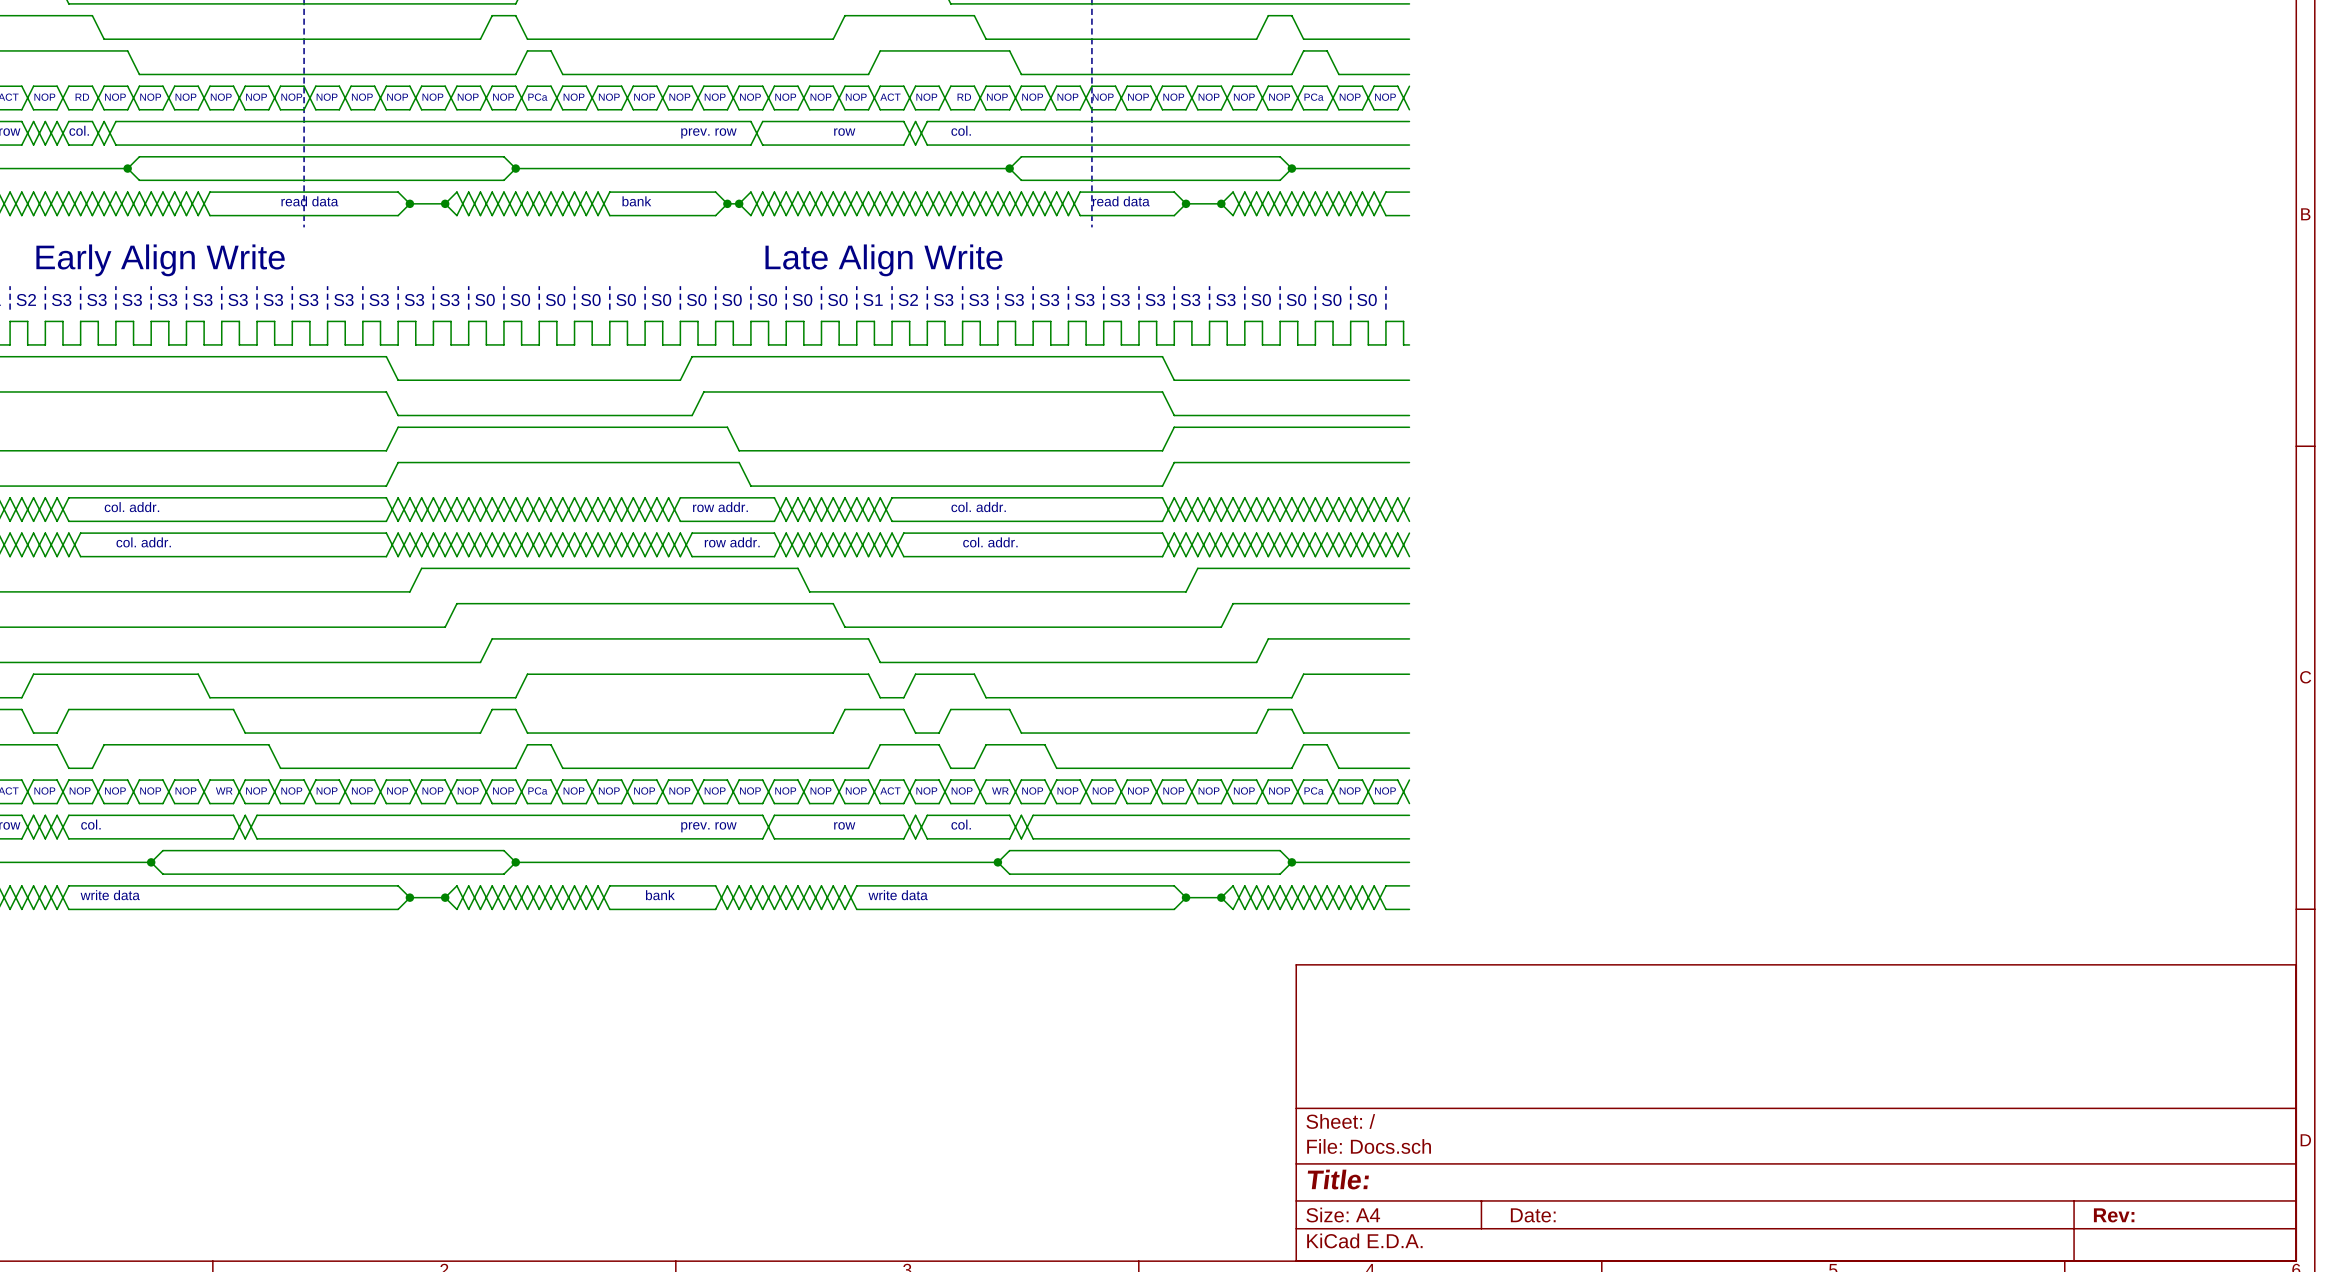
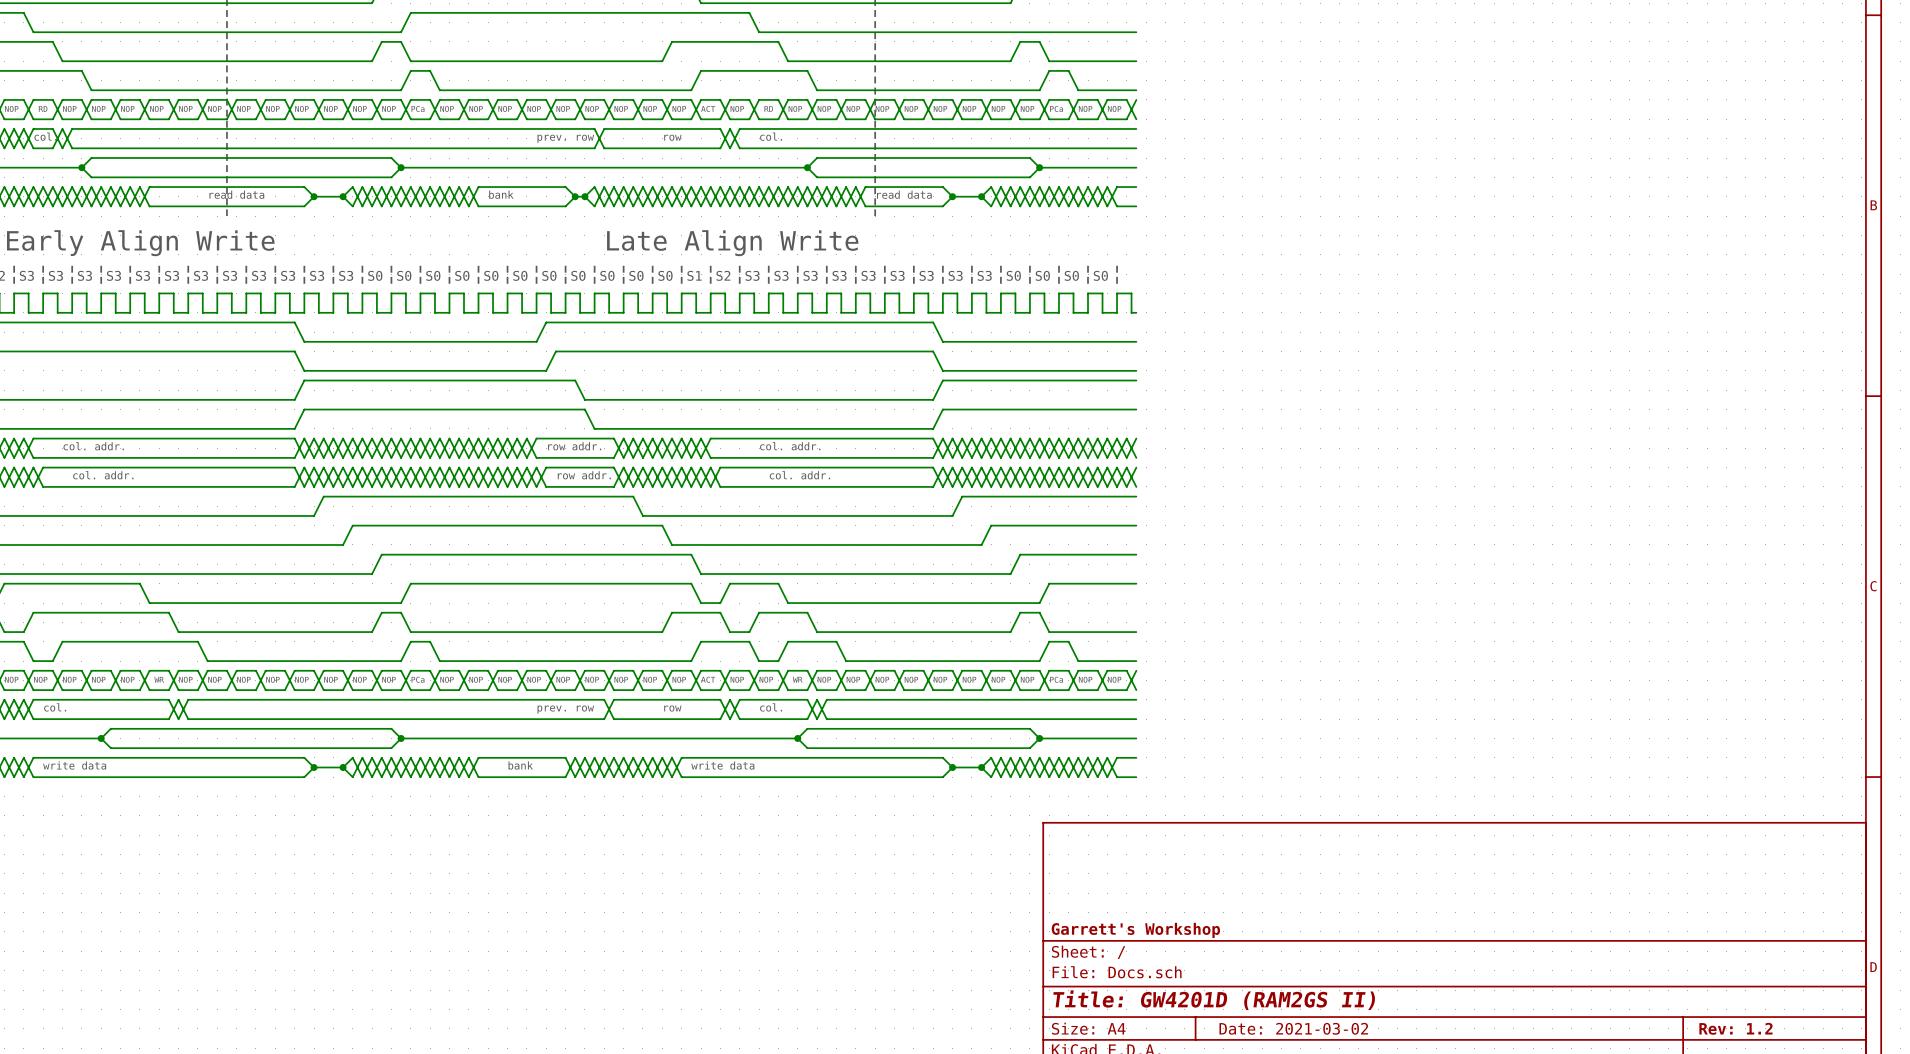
title block: none -> Garrett's Workshop (1135, 930)
title block: Title: (1338, 1179) -> Title: GW4201D (RAM2GS II) (1214, 1000)
title block: Date: (1533, 1215) -> Date: 2021-03-02 (1293, 1028)
title block: Rev: (2114, 1215) -> Rev: 1.2 (1735, 1028)

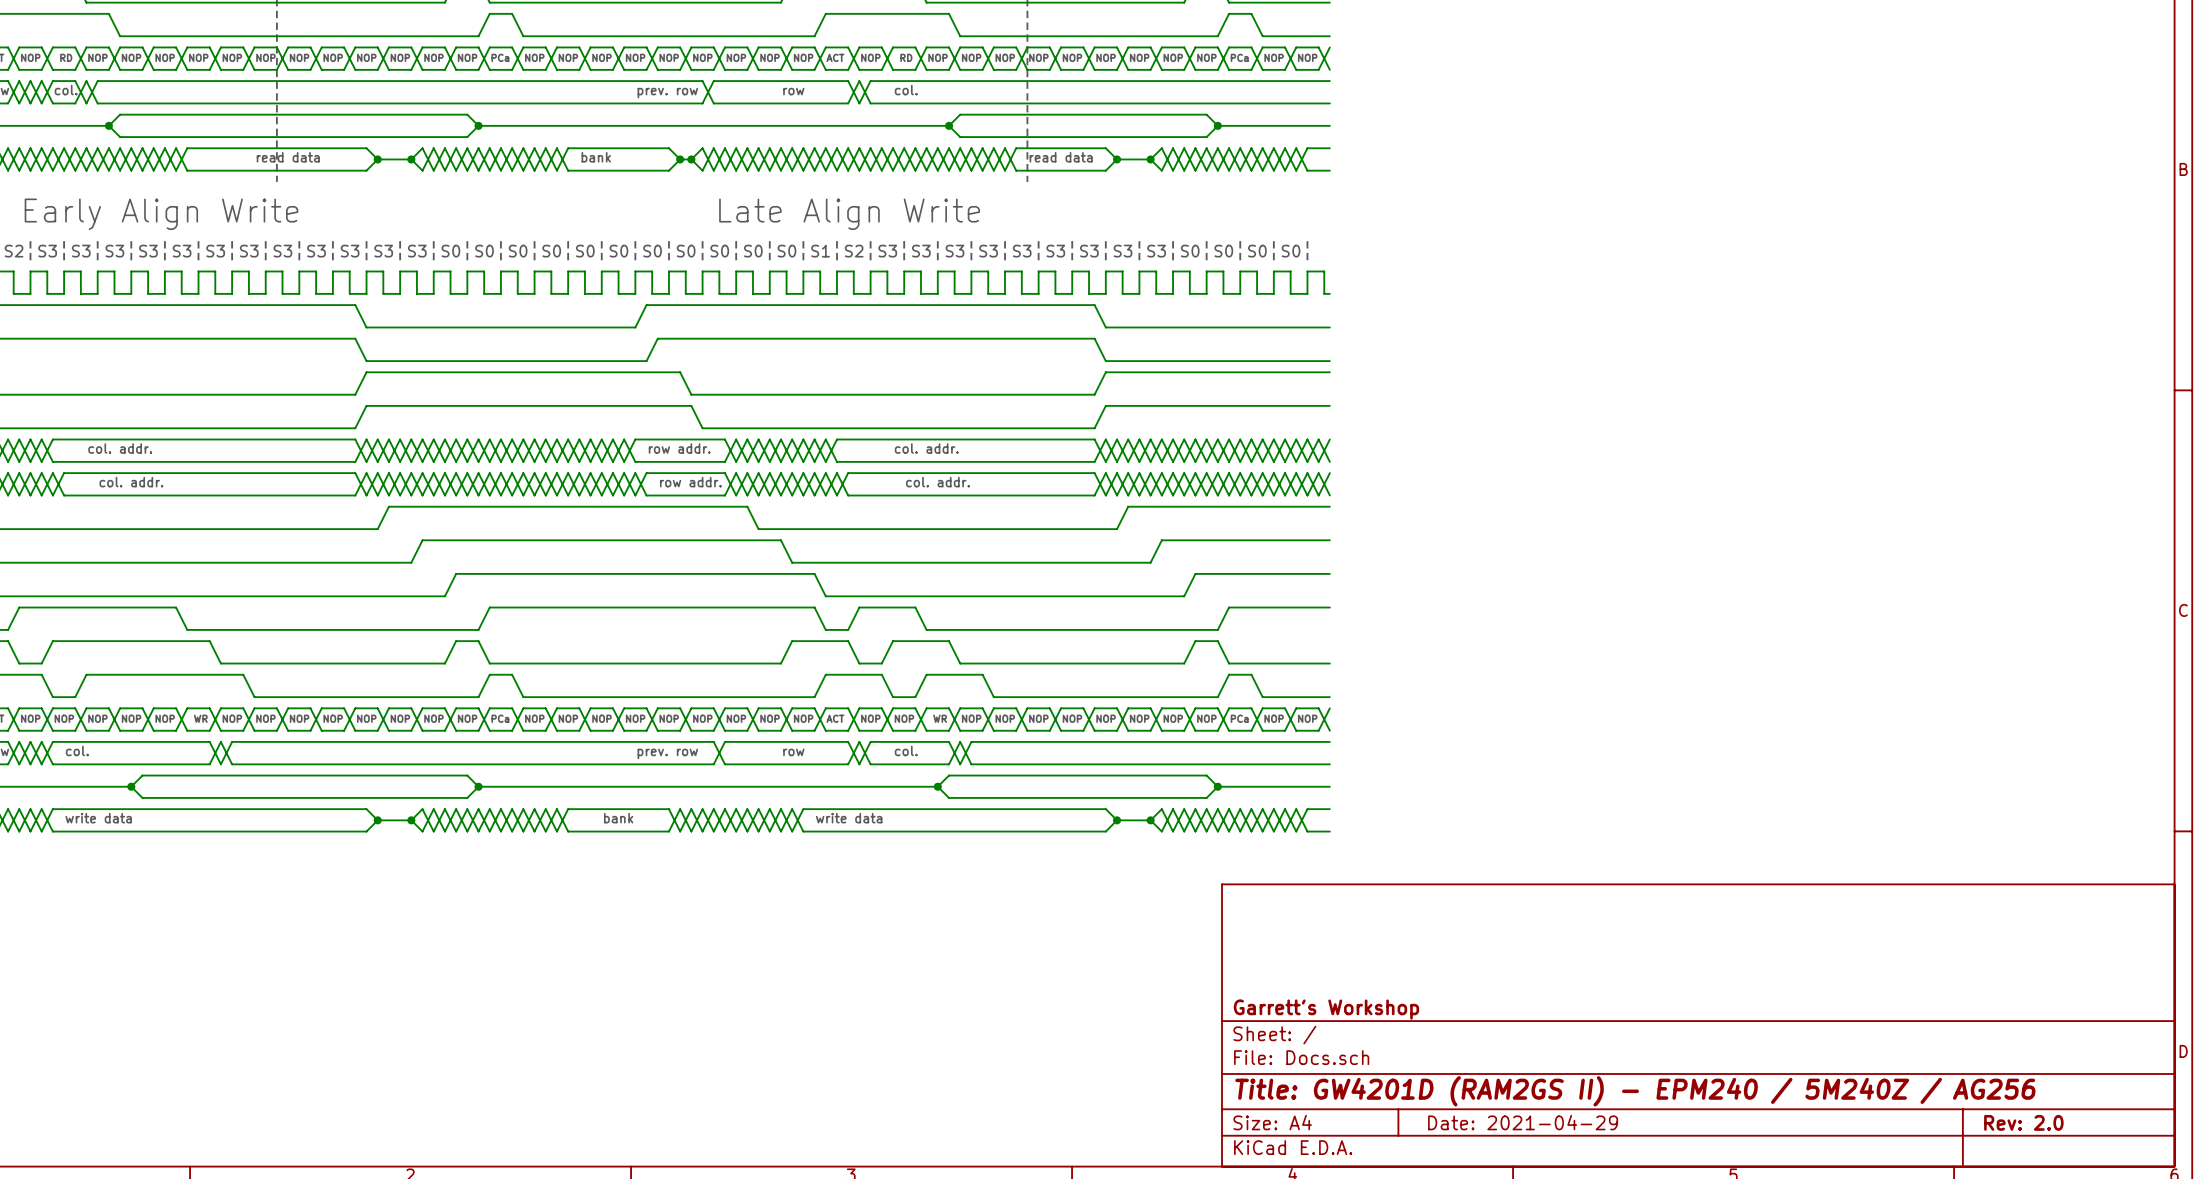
title block: Title: GW4201D (RAM2GS II) (1214, 1000) -> Title: GW4201D (RAM2GS II) - EPM240 / 5M240Z / AG256 (1635, 1091)
title block: Date: 2021-03-02 (1293, 1028) -> Date: 2021-04-29 (1523, 1122)
title block: Rev: 1.2 (1735, 1028) -> Rev: 2.0 (2023, 1122)

